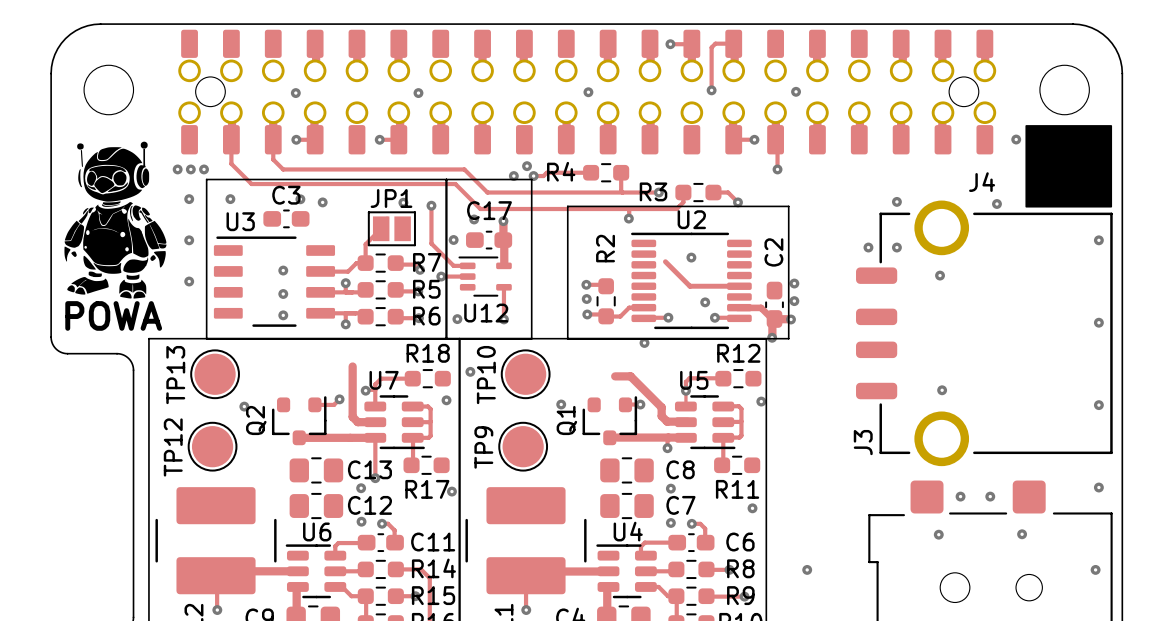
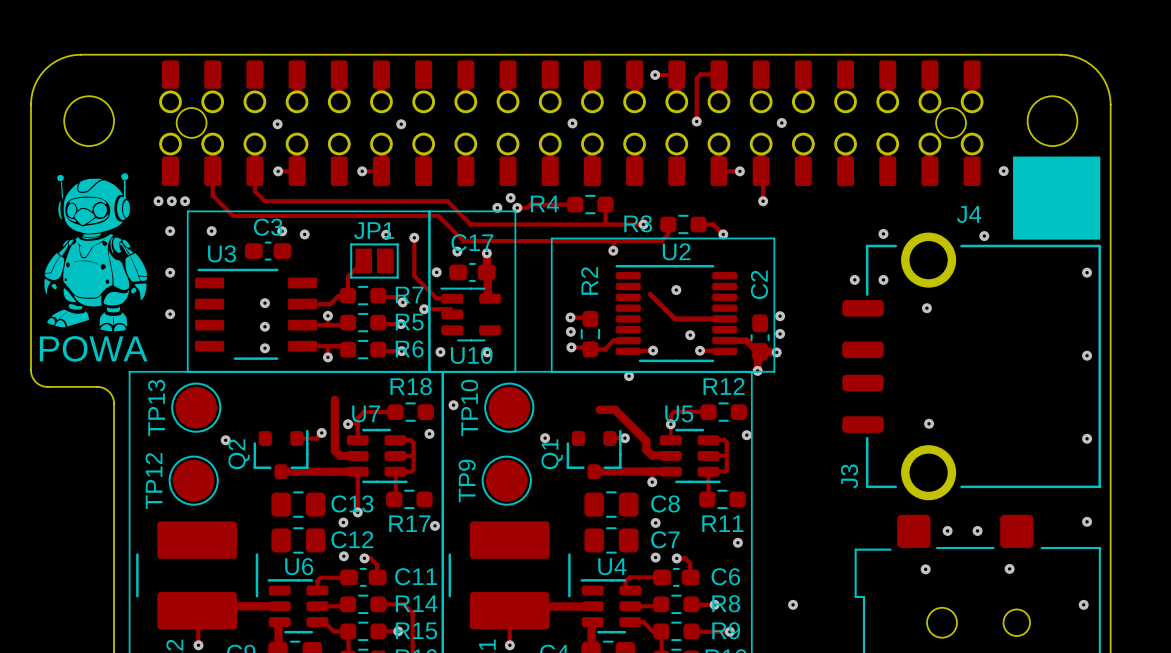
U12: (485, 276) -> none
U10: none -> (470, 314)
track: (503, 288) (503, 319) -> none

